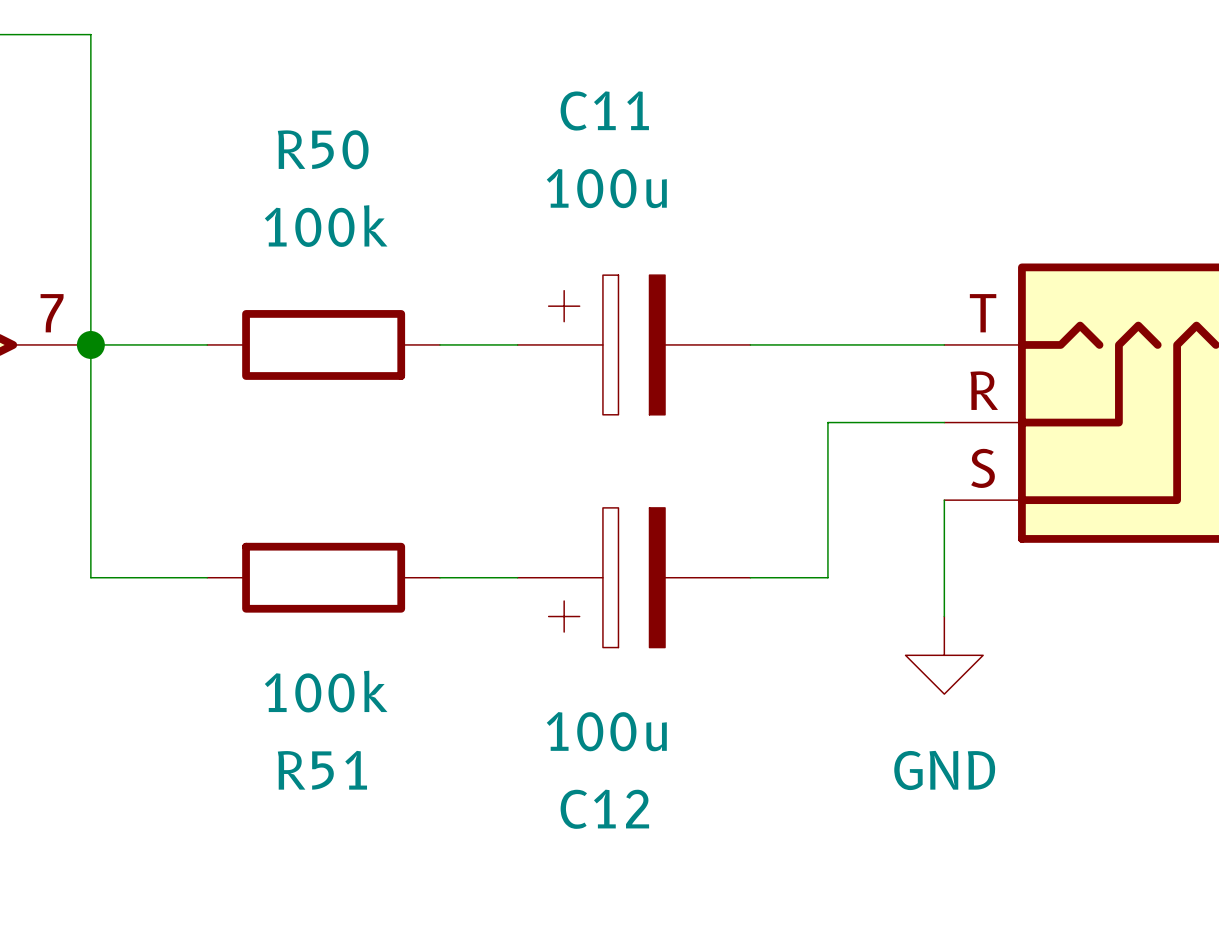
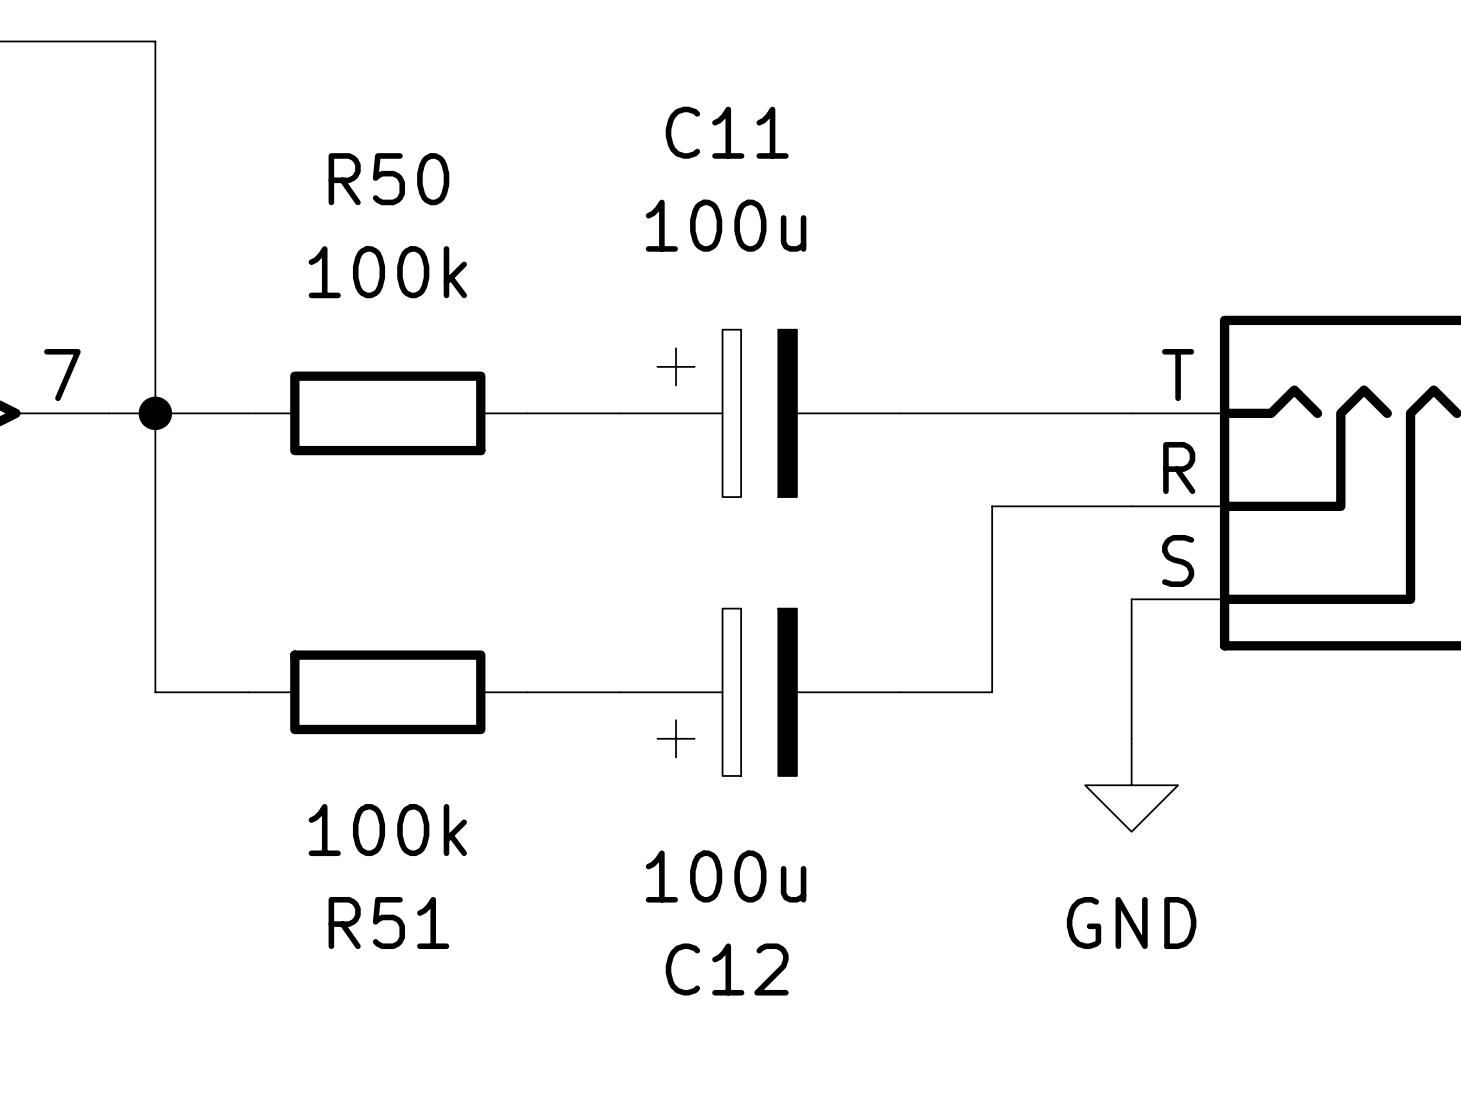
wire: (90, 34) (90, 577) (129, 577) -> (108, 41) (155, 41) (155, 692)
junction position: (90, 344) -> (155, 413)

